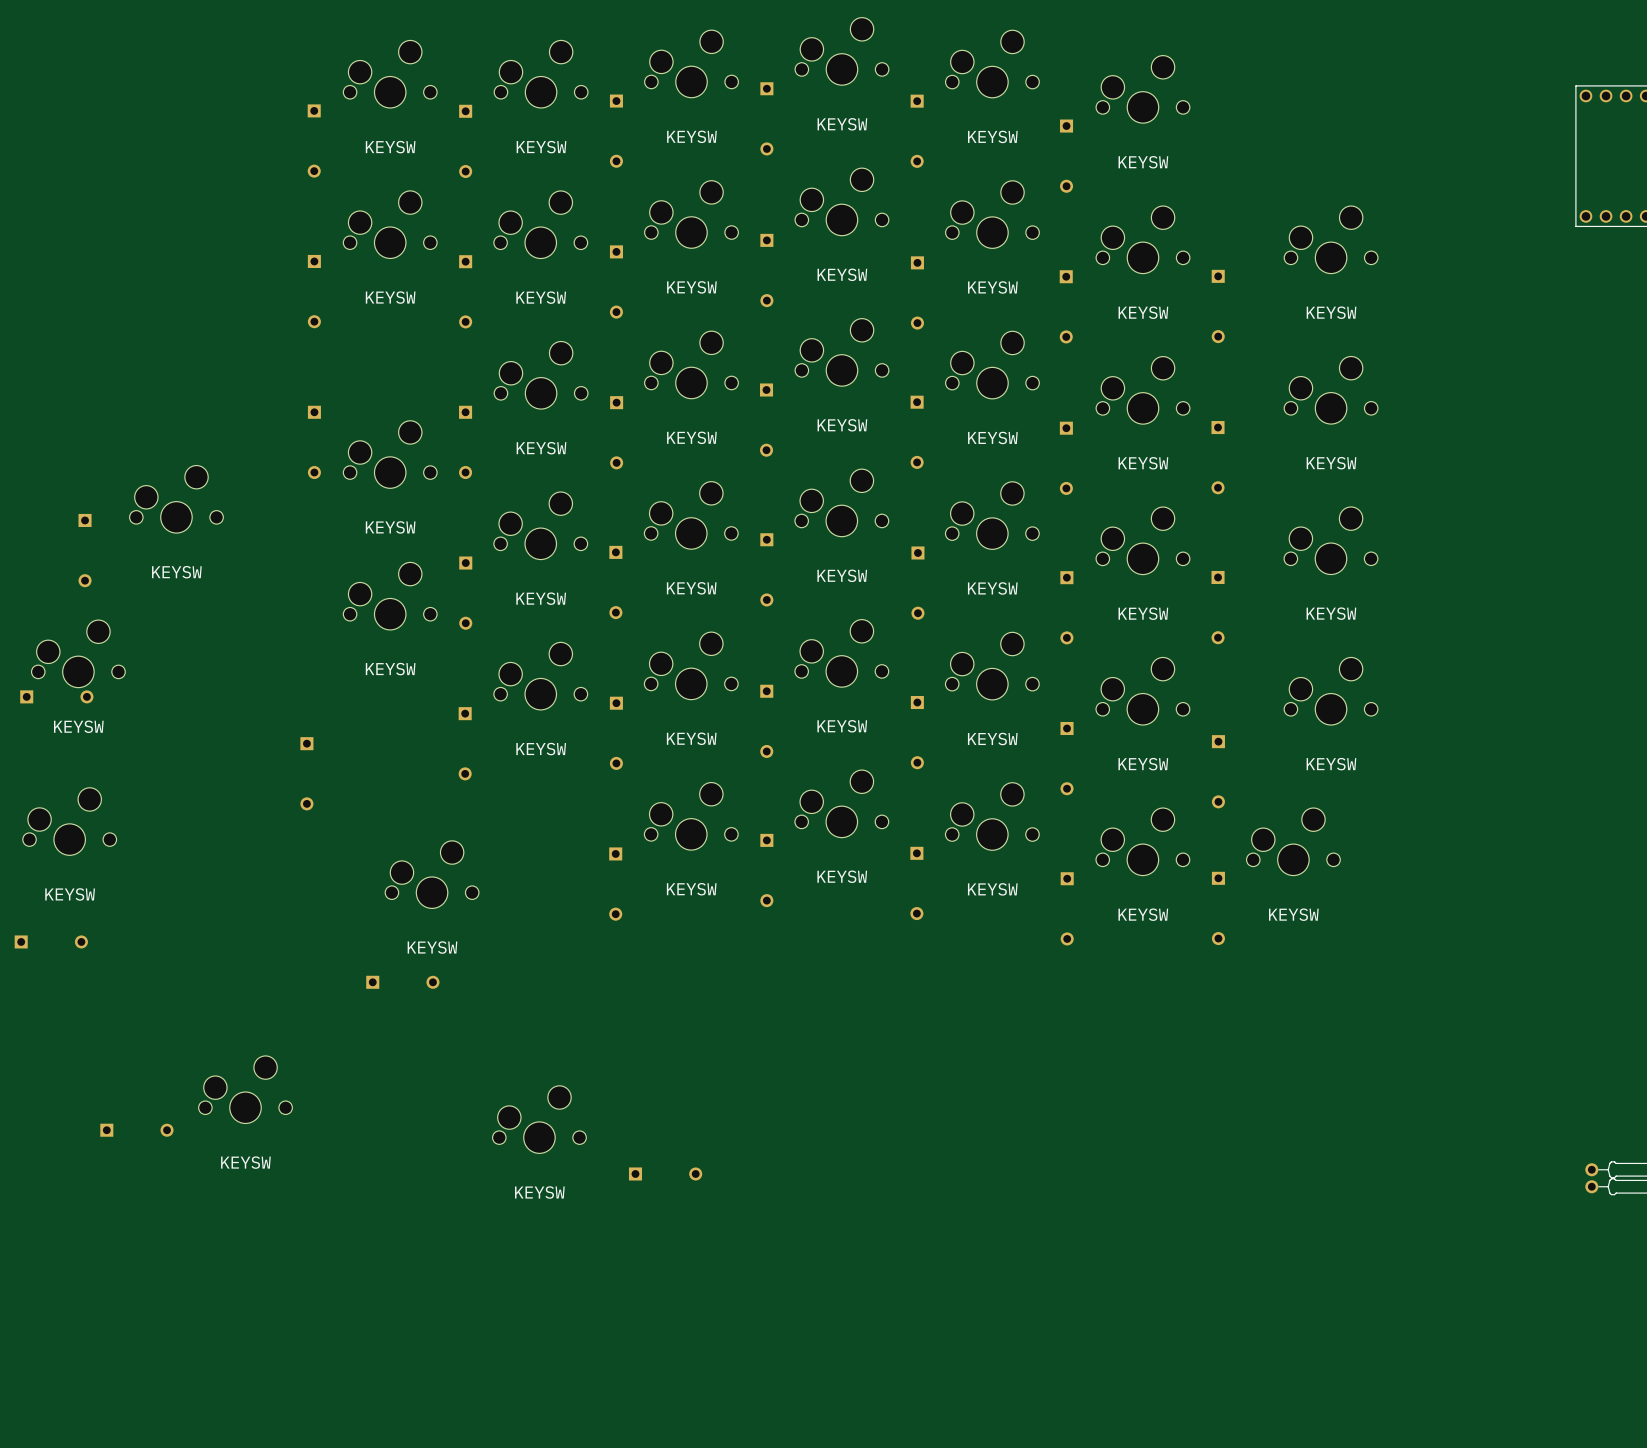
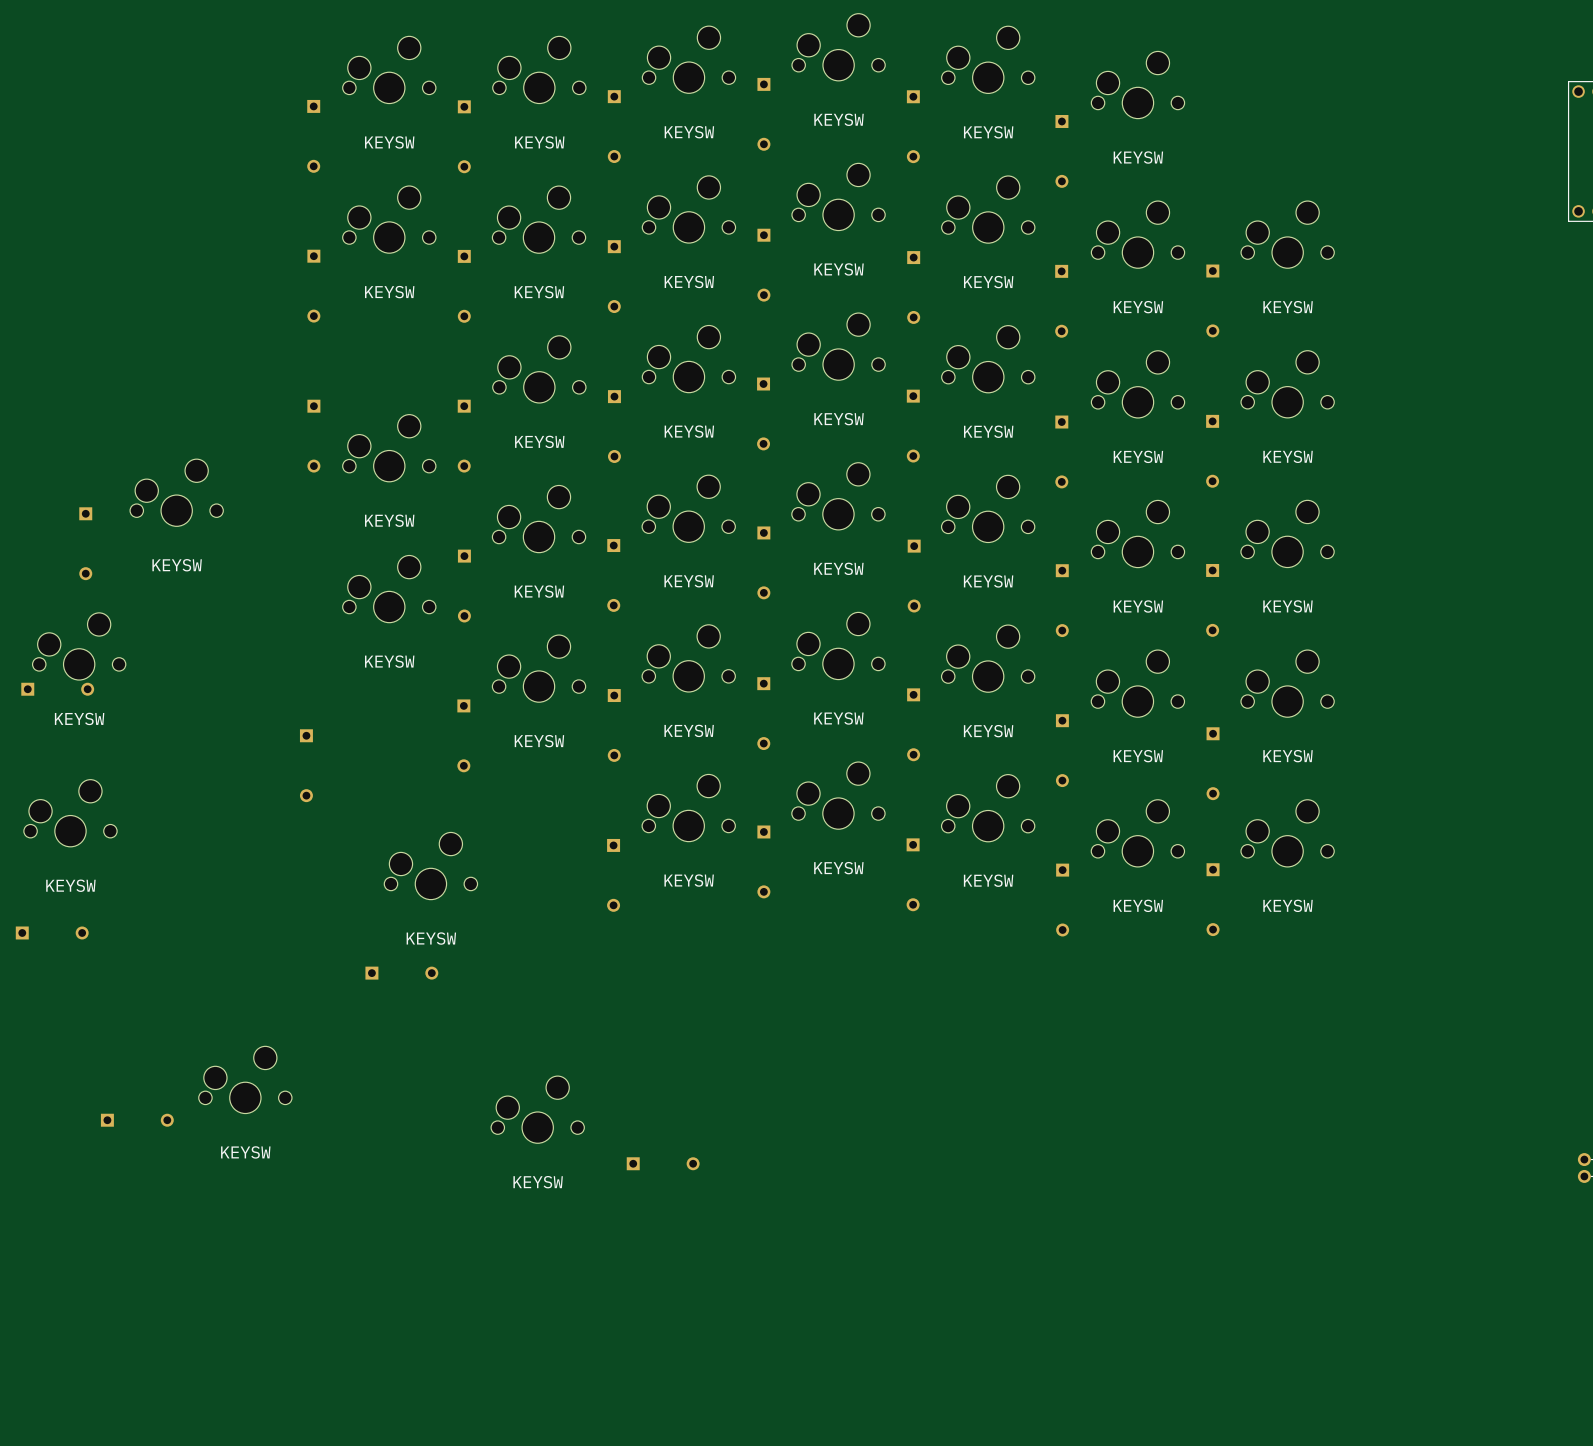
part position: (1331, 239) -> (1287, 234)
part position: (1331, 390) -> (1287, 384)
part position: (1330, 540) -> (1287, 533)
part position: (1331, 691) -> (1287, 683)

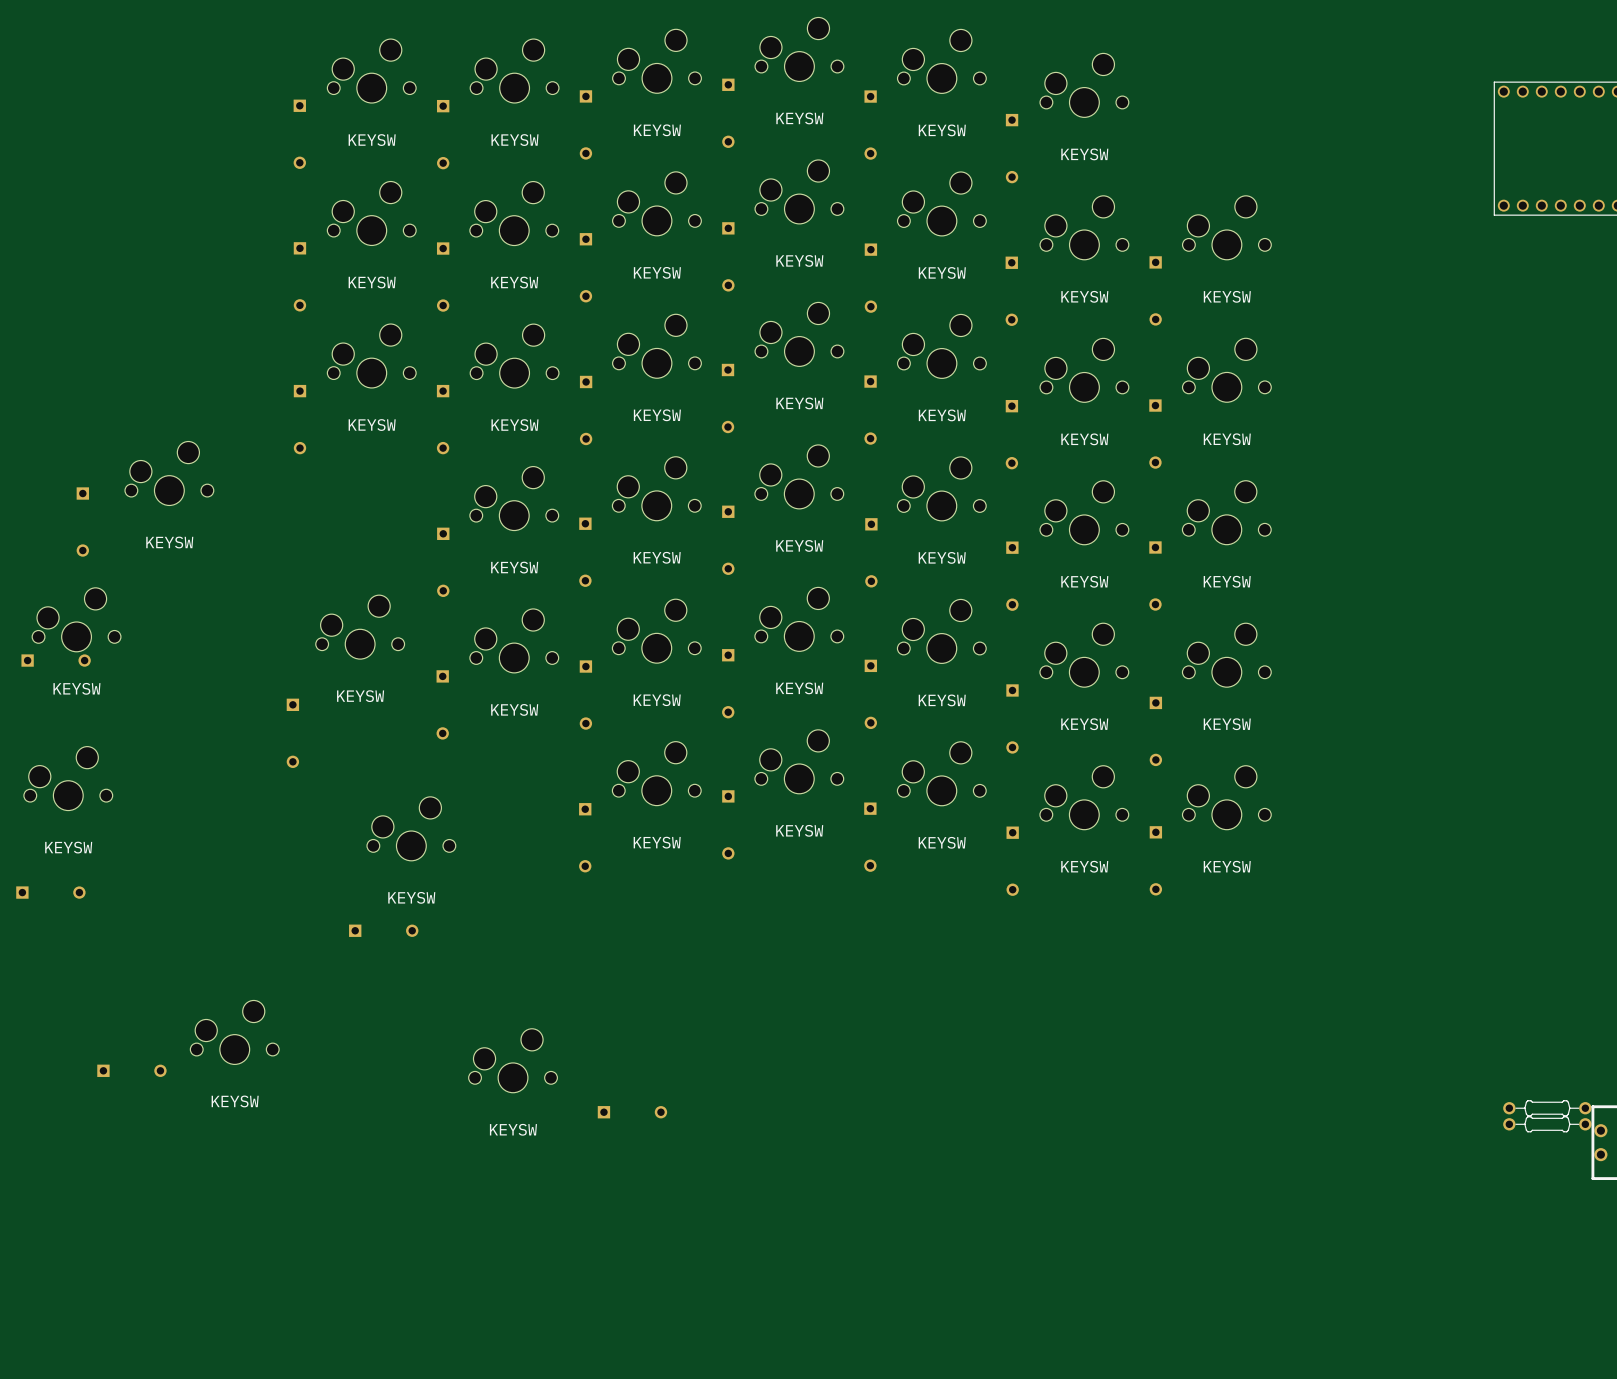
part position: (389, 448) -> (371, 355)
part position: (389, 589) -> (360, 627)

